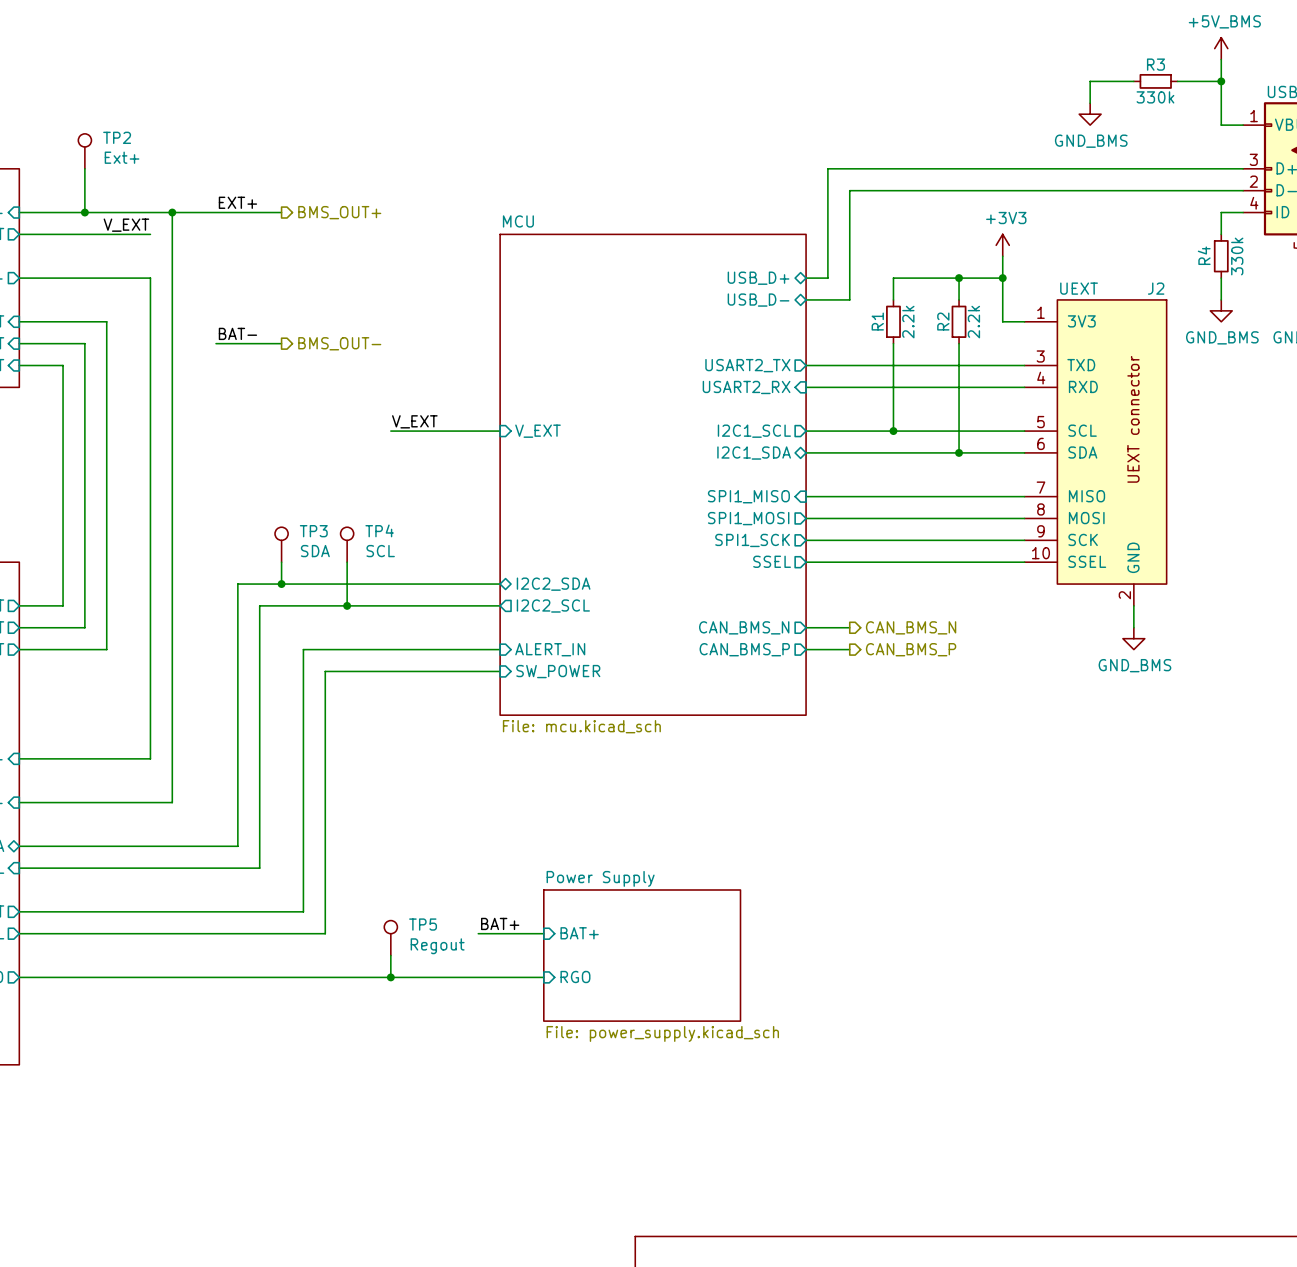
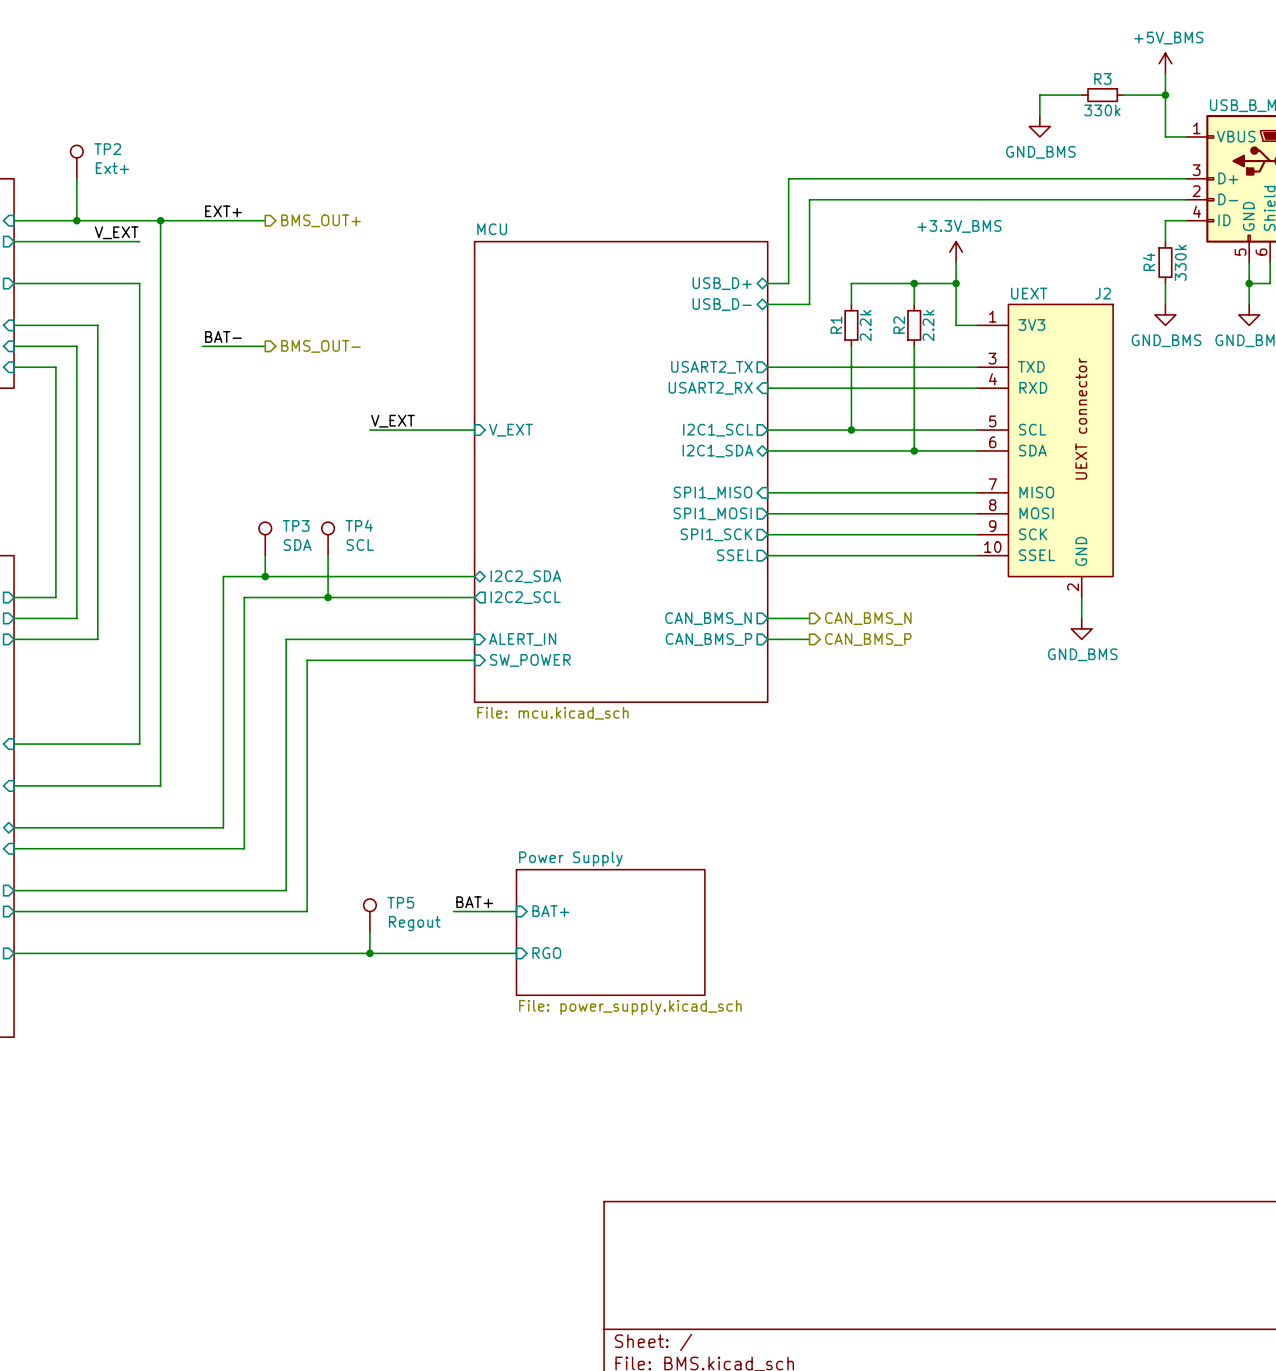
power symbol: +3V3 (1002, 245) -> +3.3V_BMS (956, 252)

